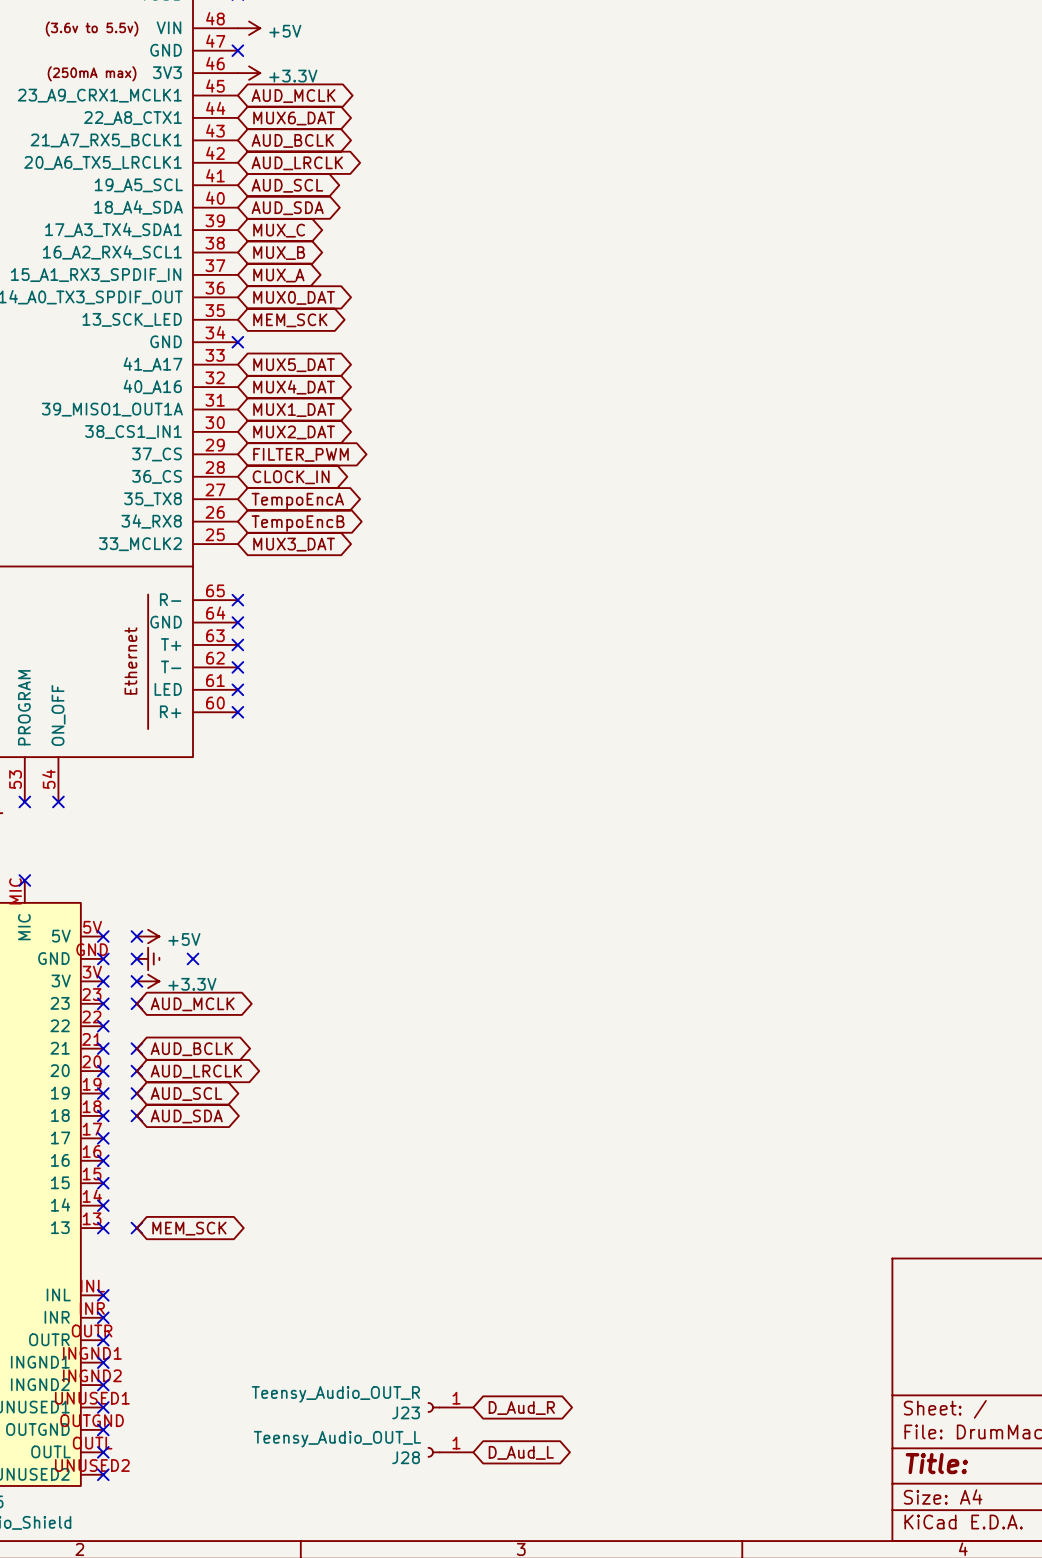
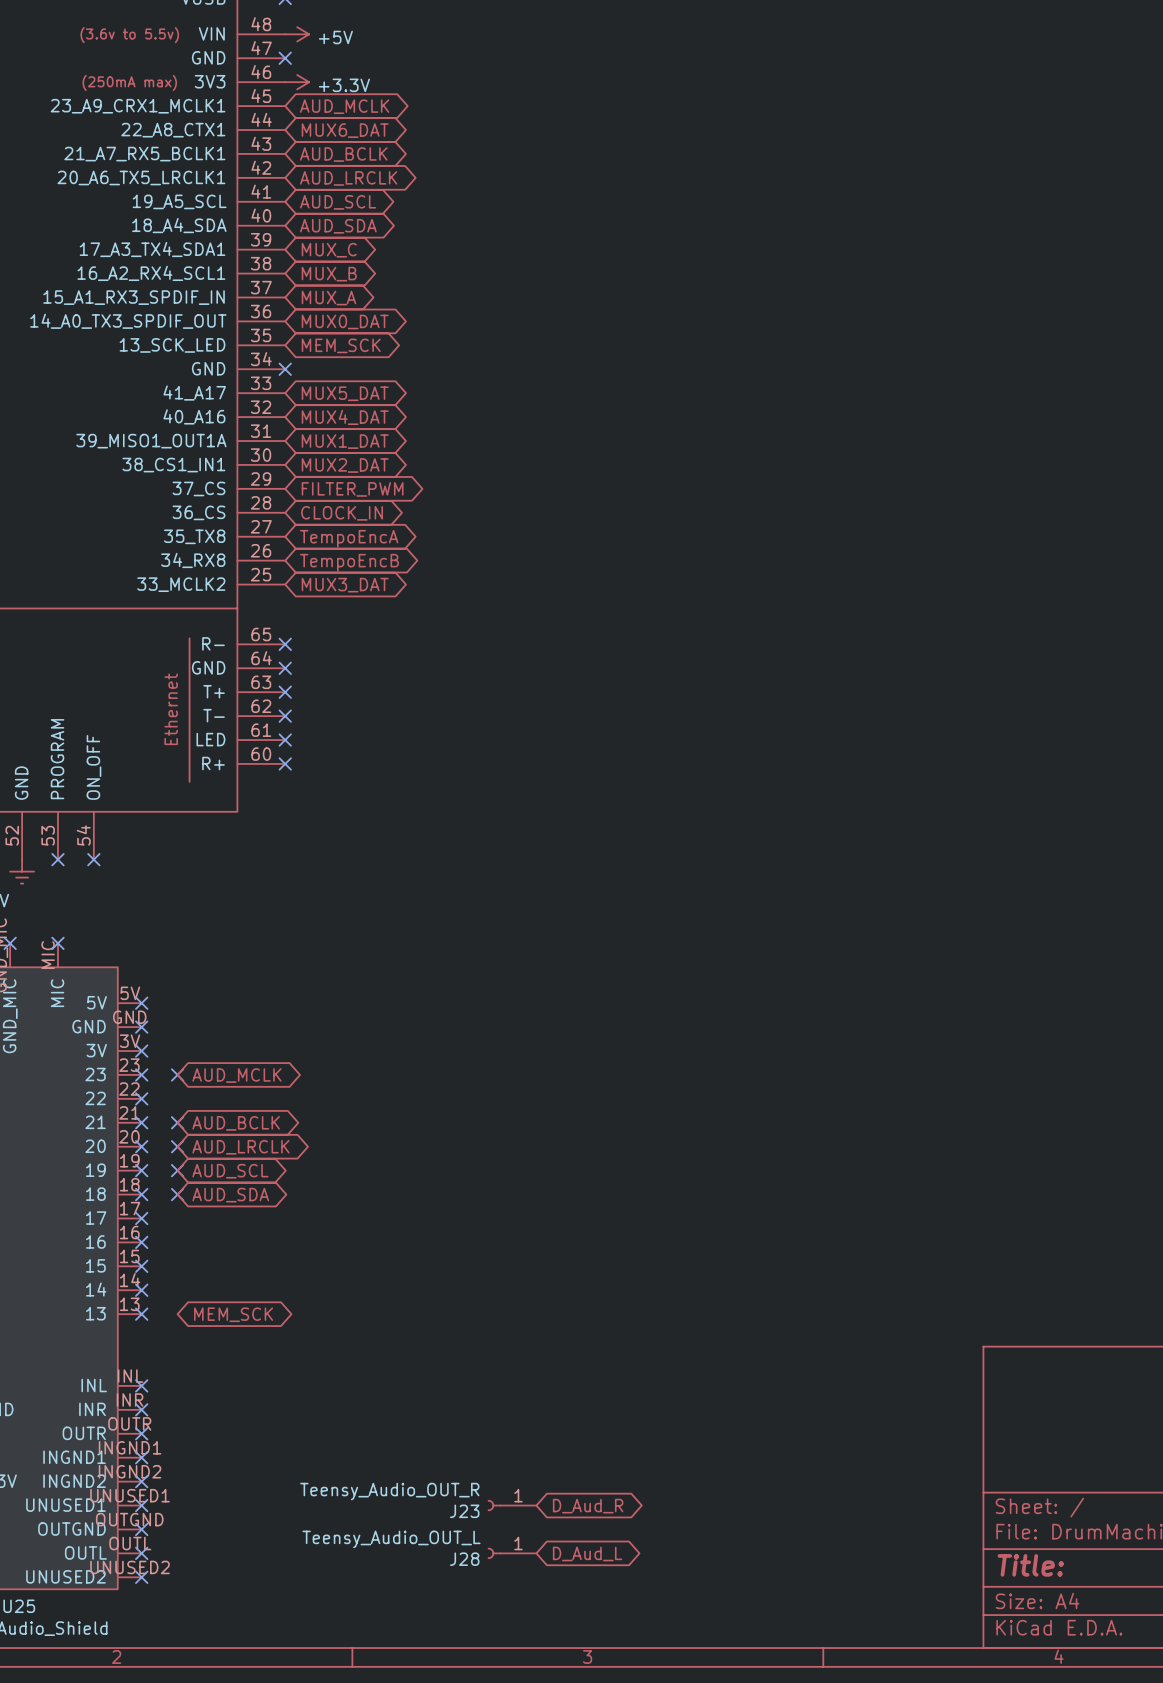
no-connect mark: (136, 936) -> none
power symbol: +5V (148, 936) -> none
no-connect mark: (136, 958) -> none
power symbol: (148, 958) -> none
no-connect mark: (193, 958) -> none
no-connect mark: (136, 981) -> none
power symbol: +3.3V (148, 981) -> none
no-connect mark: (136, 1228) -> none

